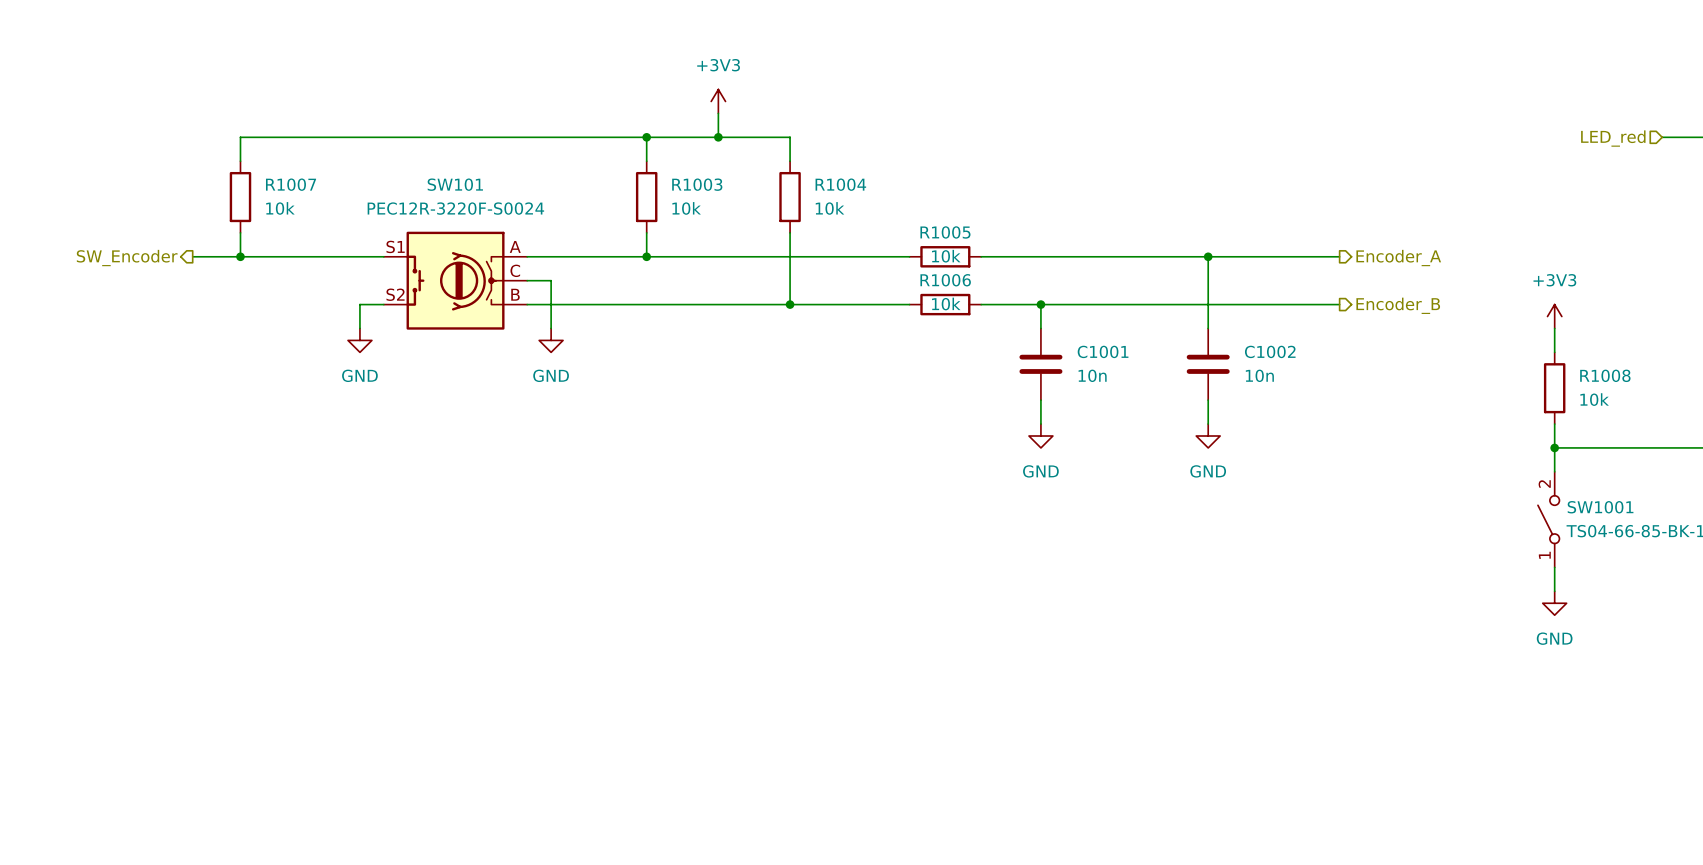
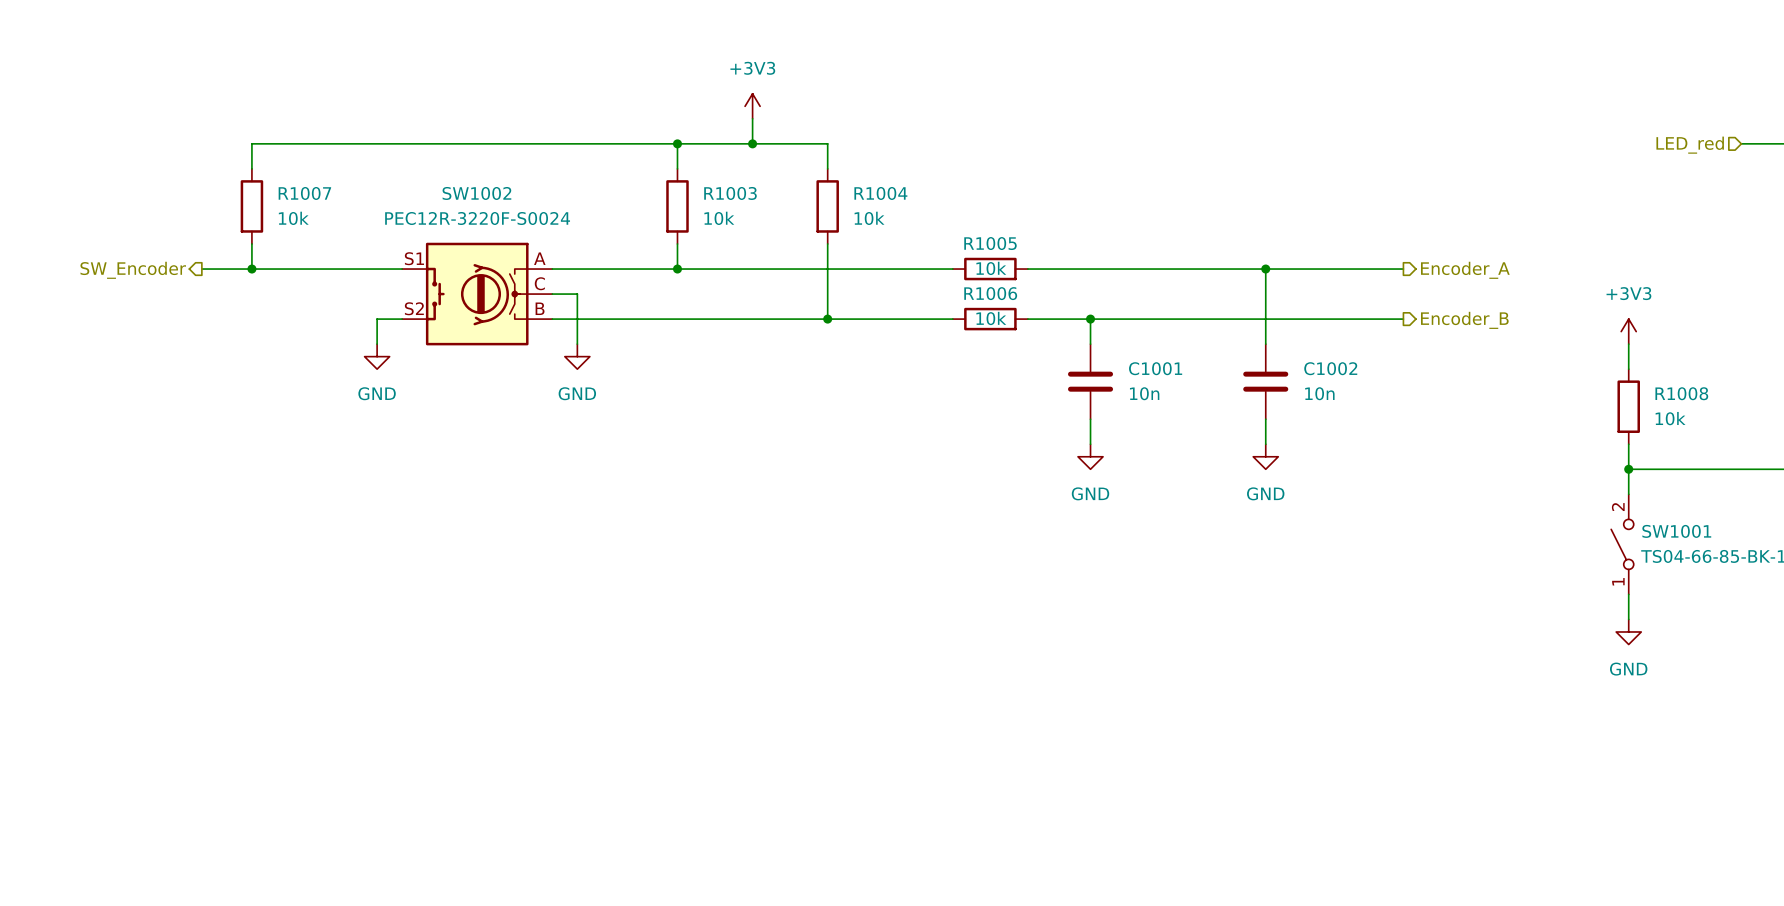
SW101 name: SW101 (455, 184) -> SW1002 (476, 193)

